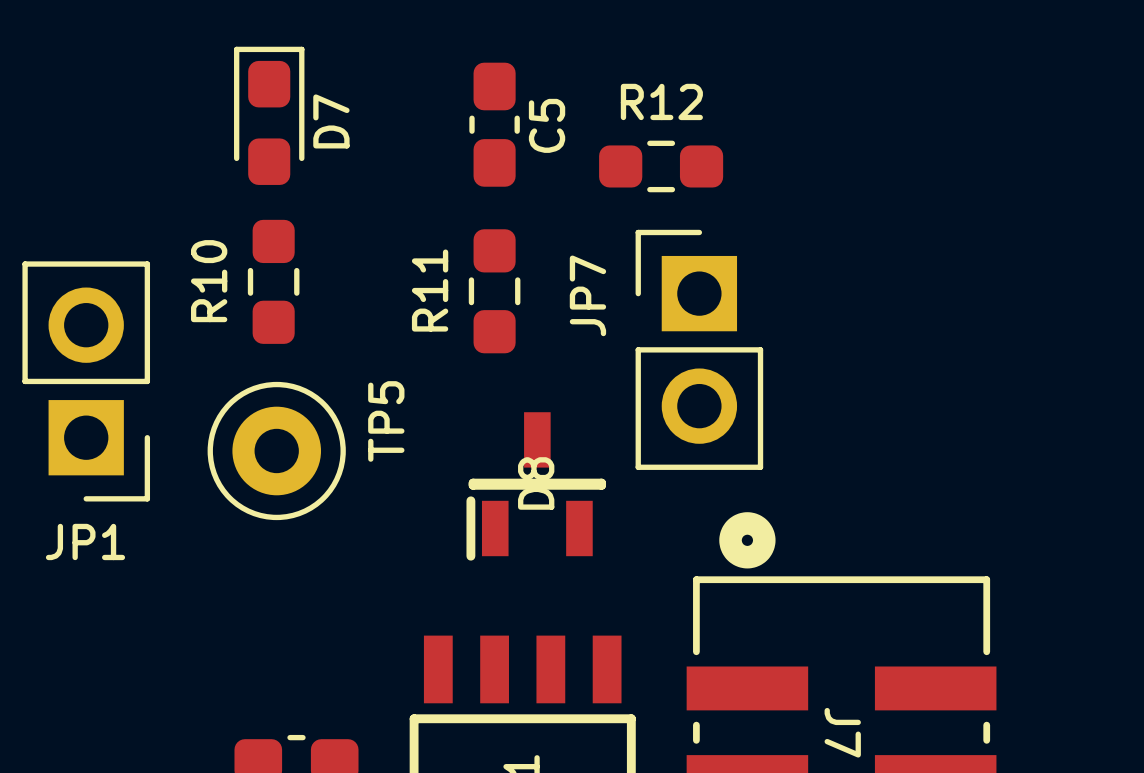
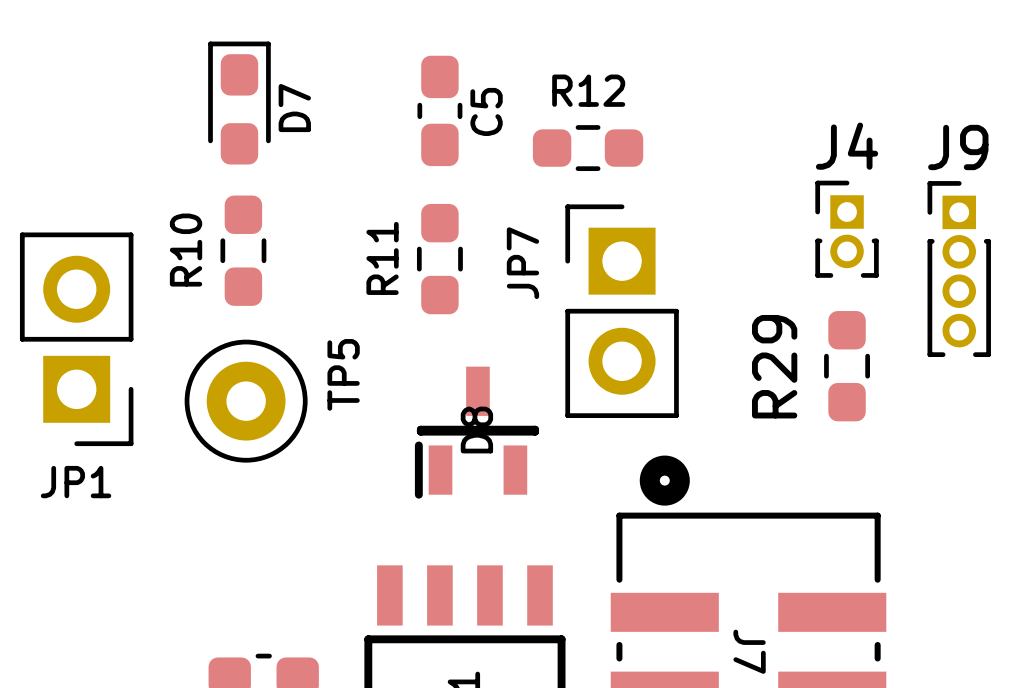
J4: none -> (847, 229)
J9: none -> (959, 269)
R29: none -> (847, 366)

